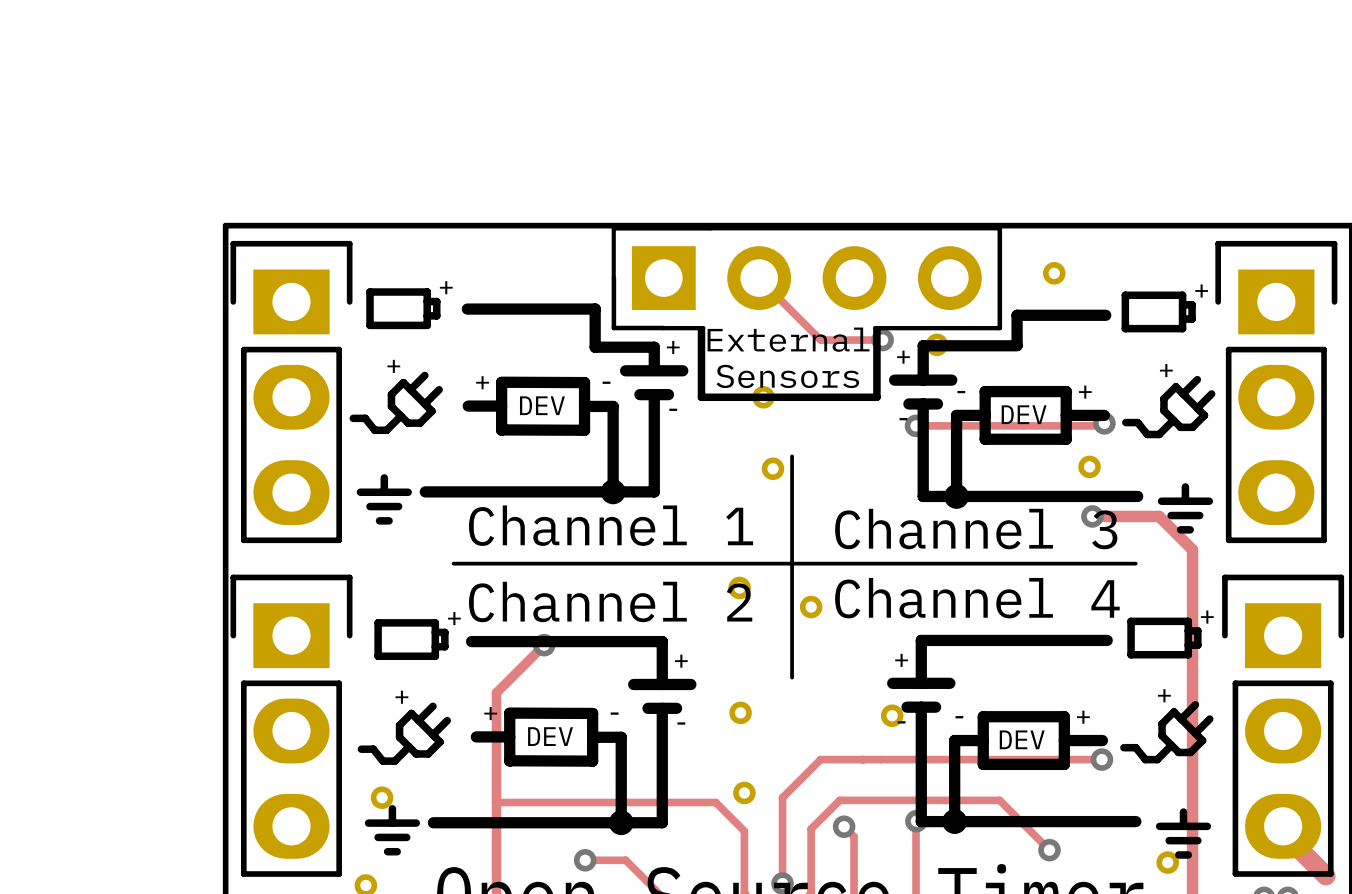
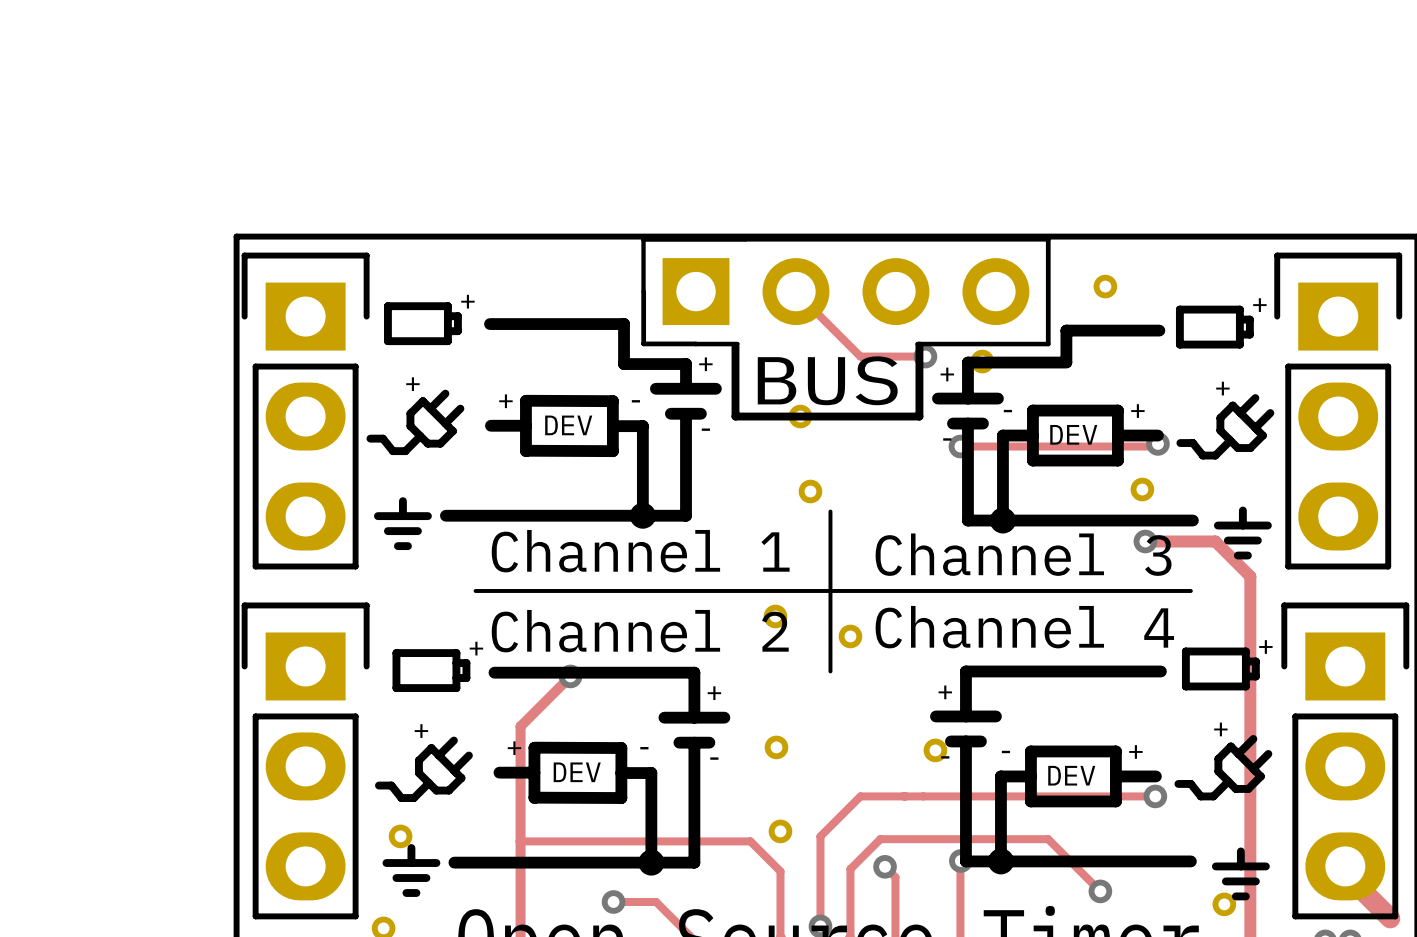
text: External (788, 339) -> none
text: none -> BUS (827, 380)
text: Sensors (787, 376) -> none
line: (792, 456) (792, 487) -> none
line: (792, 640) (792, 677) -> none

